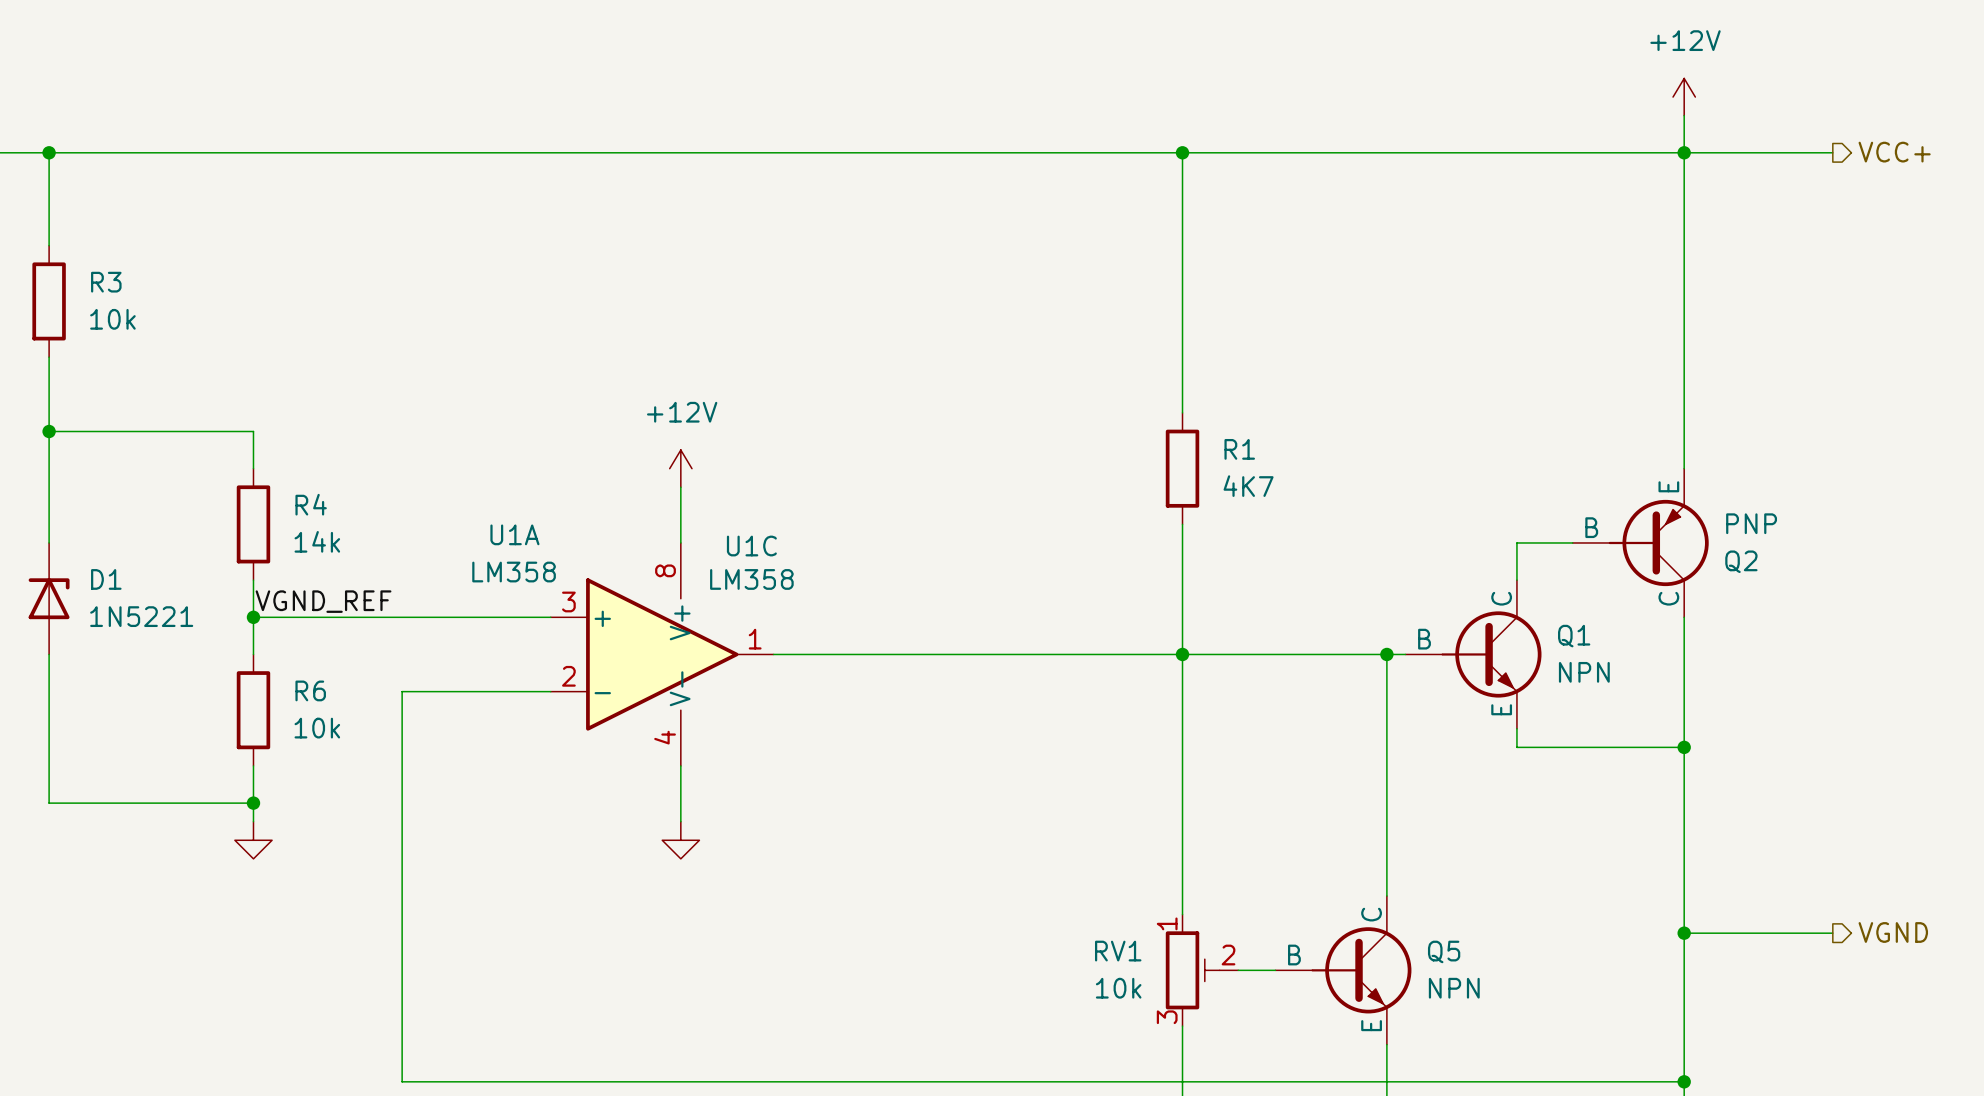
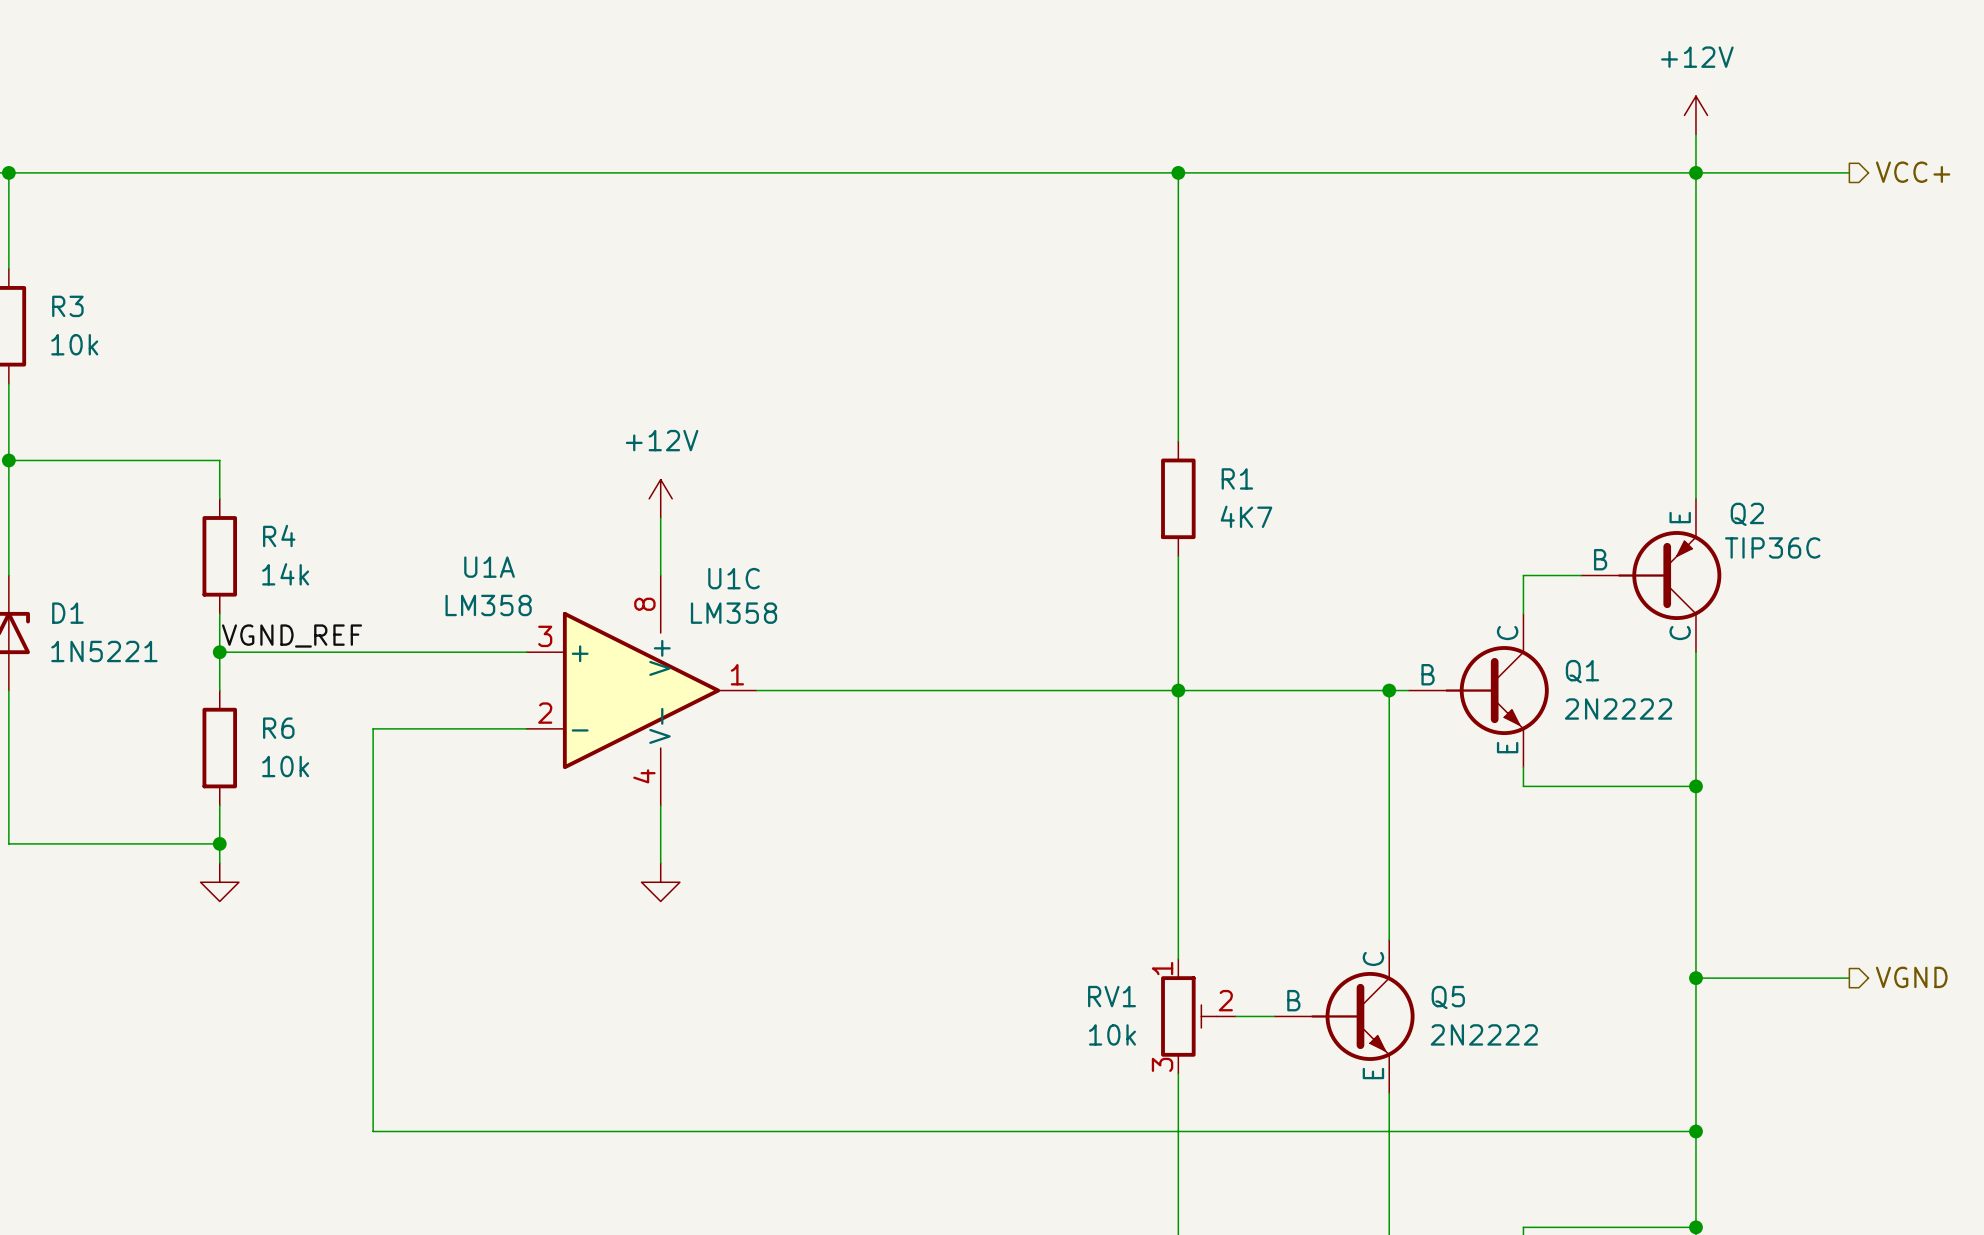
Q2 value: PNP (1751, 523) -> TIP36C (1772, 547)
Q2 name position: Q2 (1741, 561) -> Q2 (1747, 514)
Q1 value: NPN (1584, 672) -> 2N2222 (1618, 709)
Q5 value: NPN (1454, 988) -> 2N2222 (1484, 1034)

